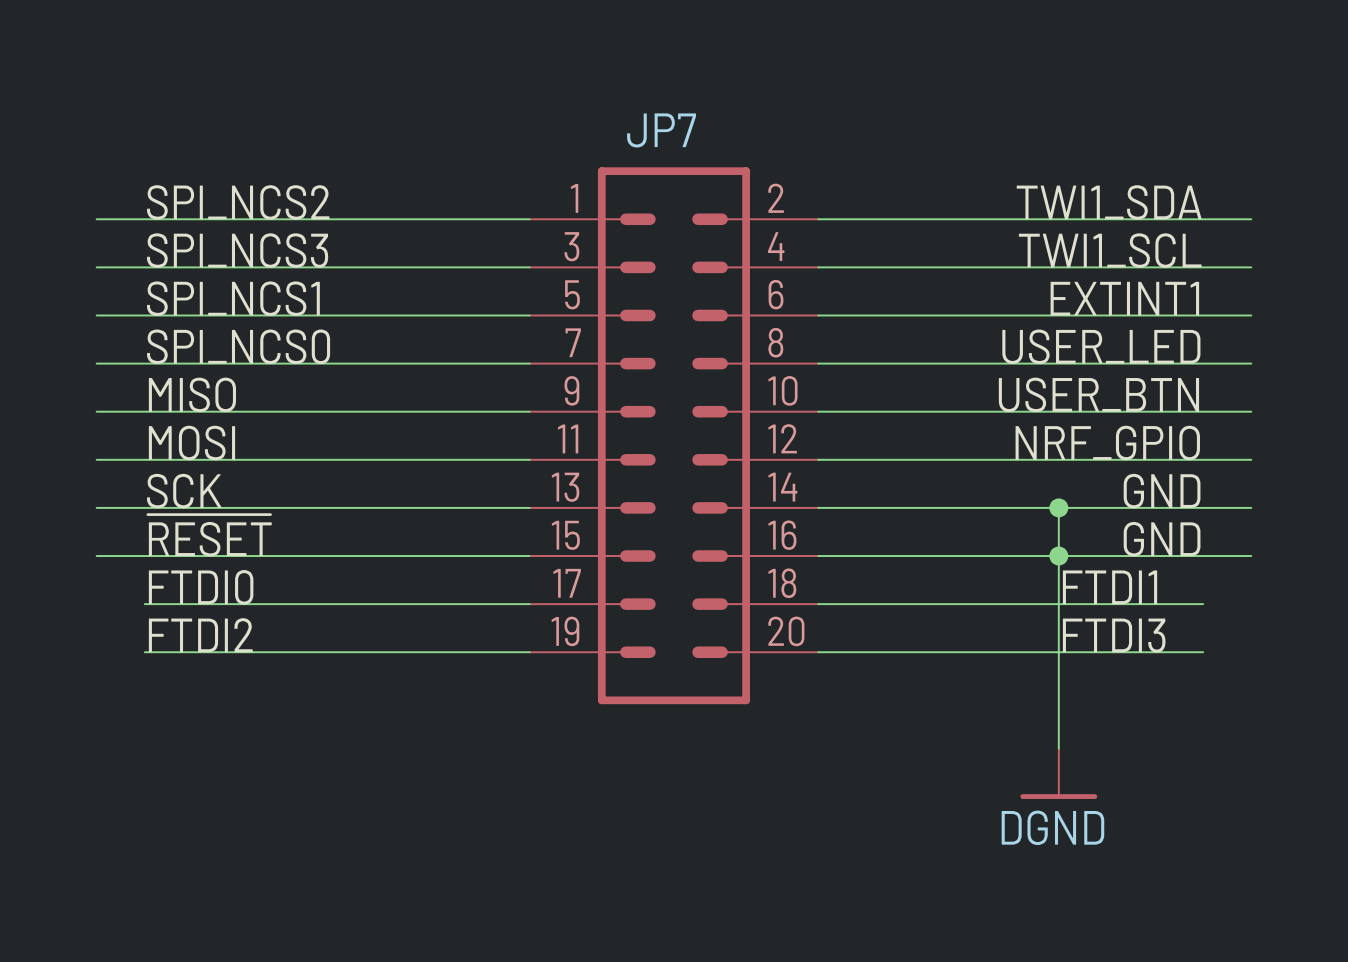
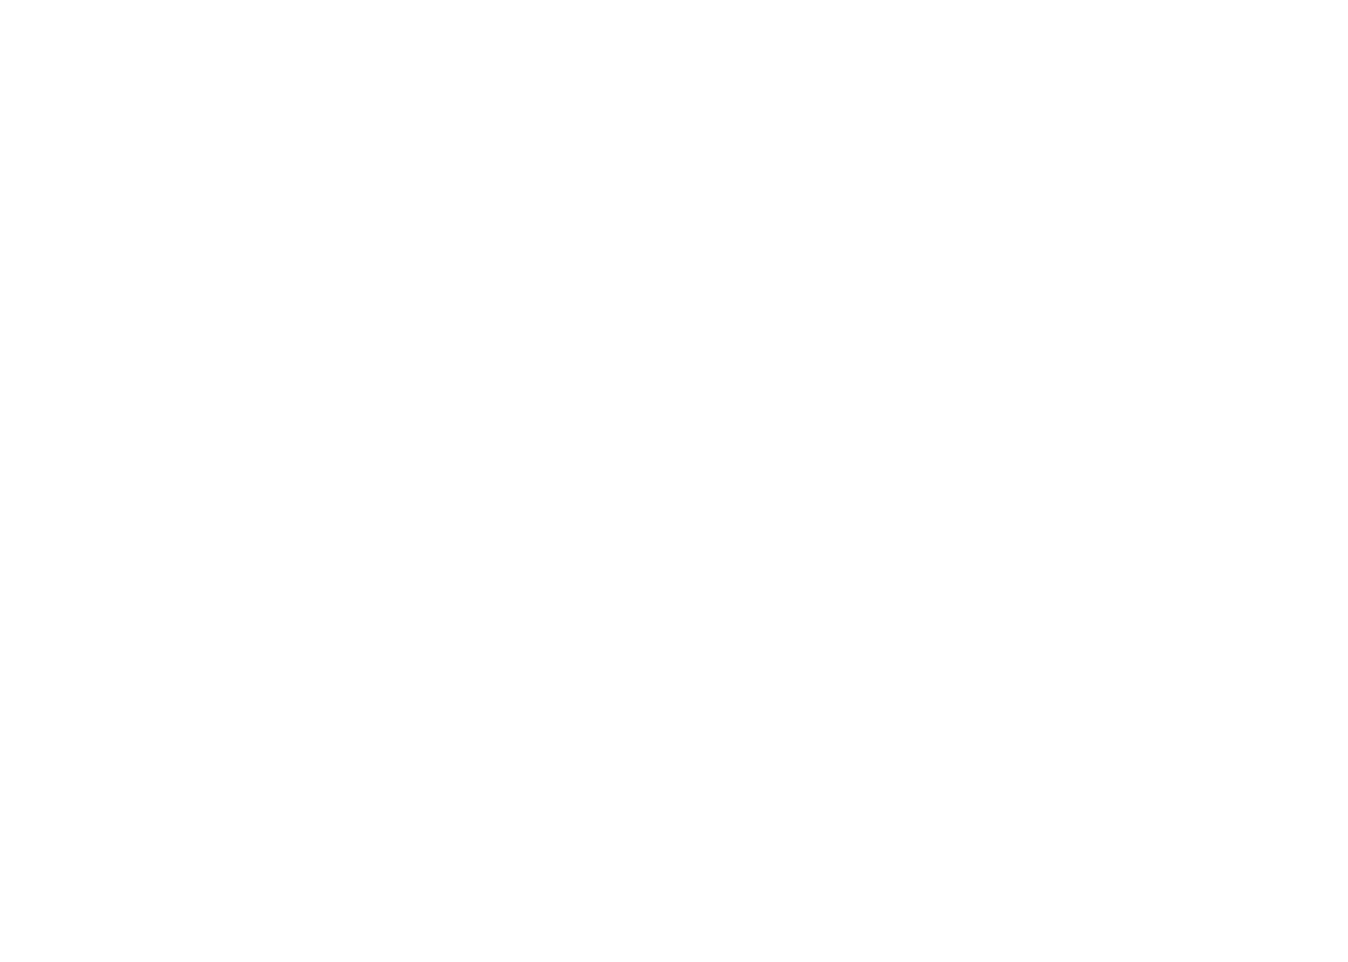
label: SPI_NCS2 (238, 202) -> none
label: TWI1_SDA (1109, 202) -> none
wire: (96, 219) (529, 219) -> none
wire: (818, 219) (1251, 219) -> none
label: SPI_NCS3 (237, 250) -> none
label: TWI1_SCL (1110, 250) -> none
wire: (96, 267) (529, 267) -> none
wire: (818, 267) (1251, 267) -> none
label: SPI_NCS1 (233, 298) -> none
label: EXTINT1 (1124, 298) -> none
wire: (96, 315) (529, 315) -> none
wire: (818, 315) (1251, 315) -> none
label: SPI_NCS0 (238, 346) -> none
label: USER_LED (1101, 346) -> none
wire: (96, 363) (529, 363) -> none
wire: (818, 363) (1251, 363) -> none
label: MISO (192, 394) -> none
label: USER_BTN (1098, 394) -> none
wire: (96, 411) (529, 411) -> none
wire: (818, 411) (1251, 411) -> none
JP7: (673, 435) -> none
label: MOSI (191, 442) -> none
label: NRF_GPIO (1107, 442) -> none
wire: (96, 459) (529, 459) -> none
wire: (818, 459) (1251, 459) -> none
label: SCK (184, 491) -> none
label: GND (1162, 491) -> none
wire: (96, 507) (529, 507) -> none
wire: (818, 507) (1251, 507) -> none
wire: (1058, 507) (1058, 748) -> none
junction: (1058, 507) -> none
label: ~{RESET} (209, 535) -> none
label: GND (1162, 539) -> none
wire: (96, 556) (529, 556) -> none
wire: (818, 556) (1251, 556) -> none
junction: (1058, 556) -> none
label: FTDI0 (201, 587) -> none
label: FTDI1 (1110, 587) -> none
wire: (144, 604) (529, 604) -> none
wire: (818, 604) (1203, 604) -> none
label: FTDI2 (200, 635) -> none
label: FTDI3 (1114, 635) -> none
wire: (144, 652) (529, 652) -> none
wire: (818, 652) (1203, 652) -> none
power symbol: DGND (1058, 773) -> none

